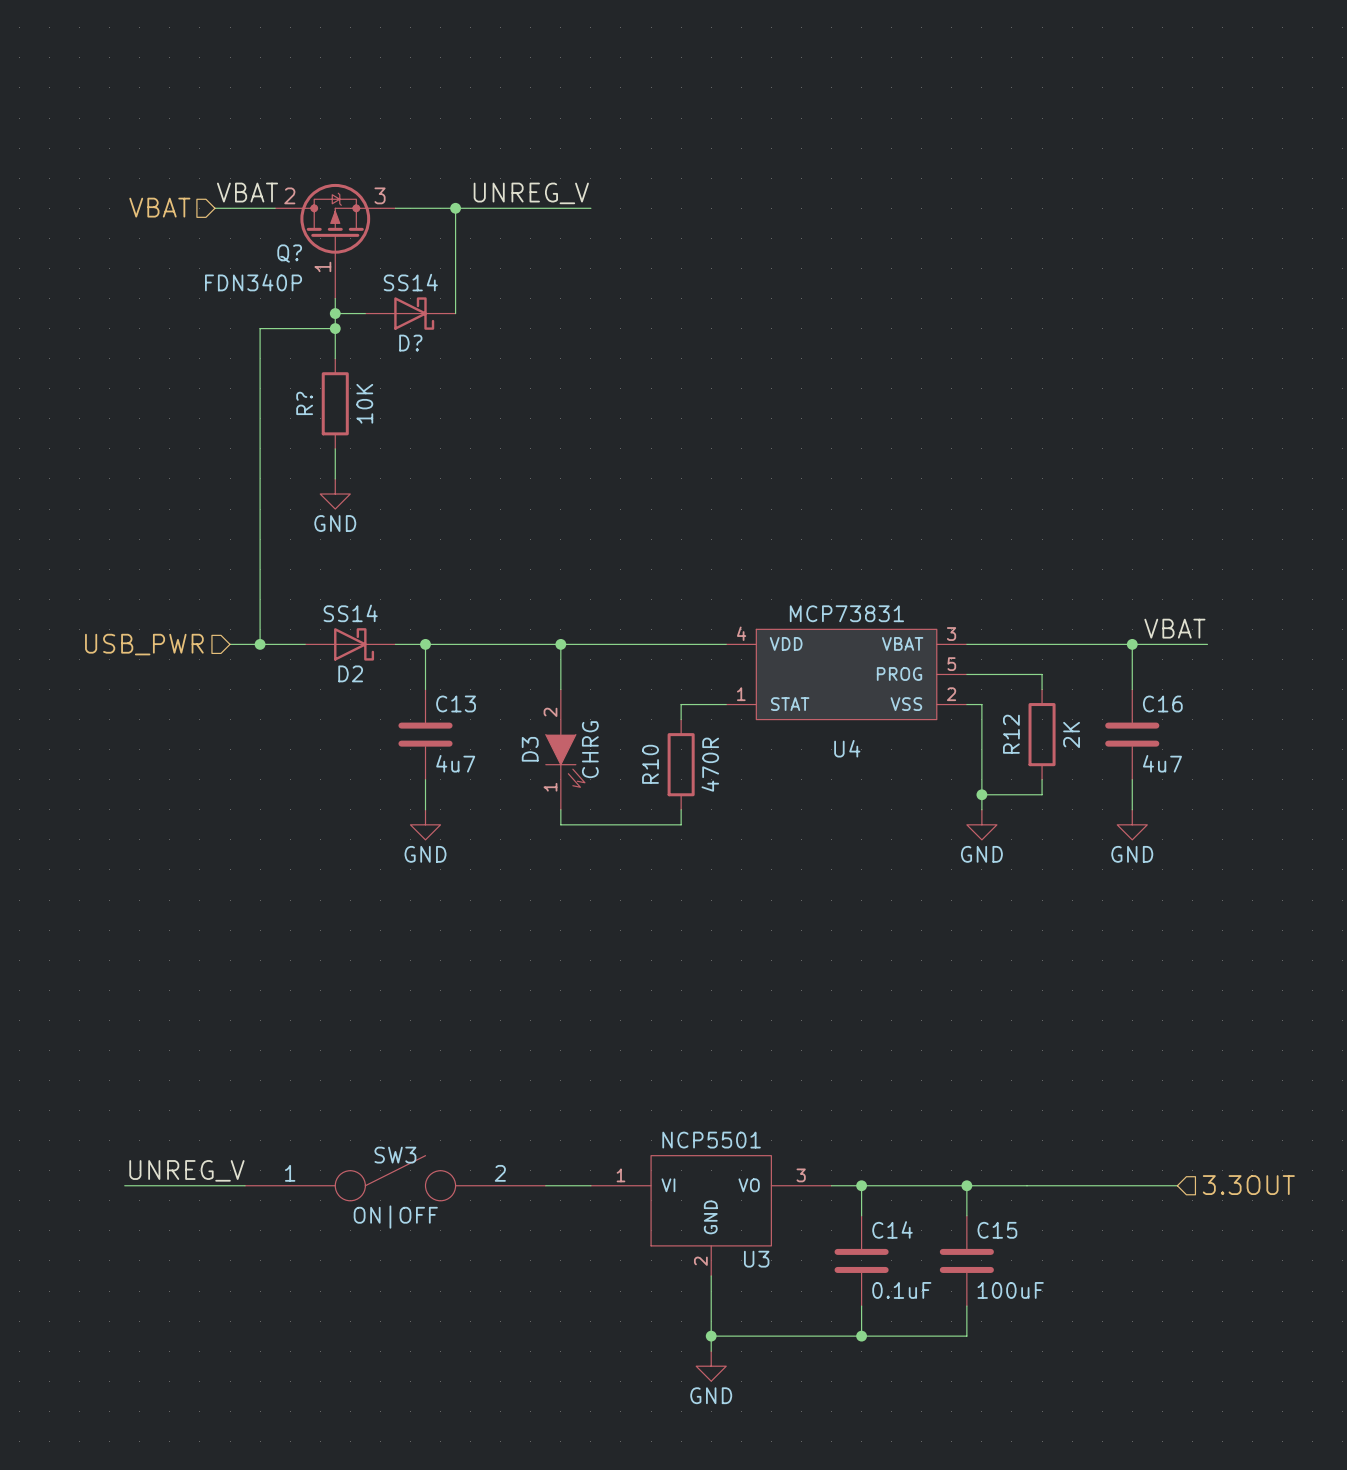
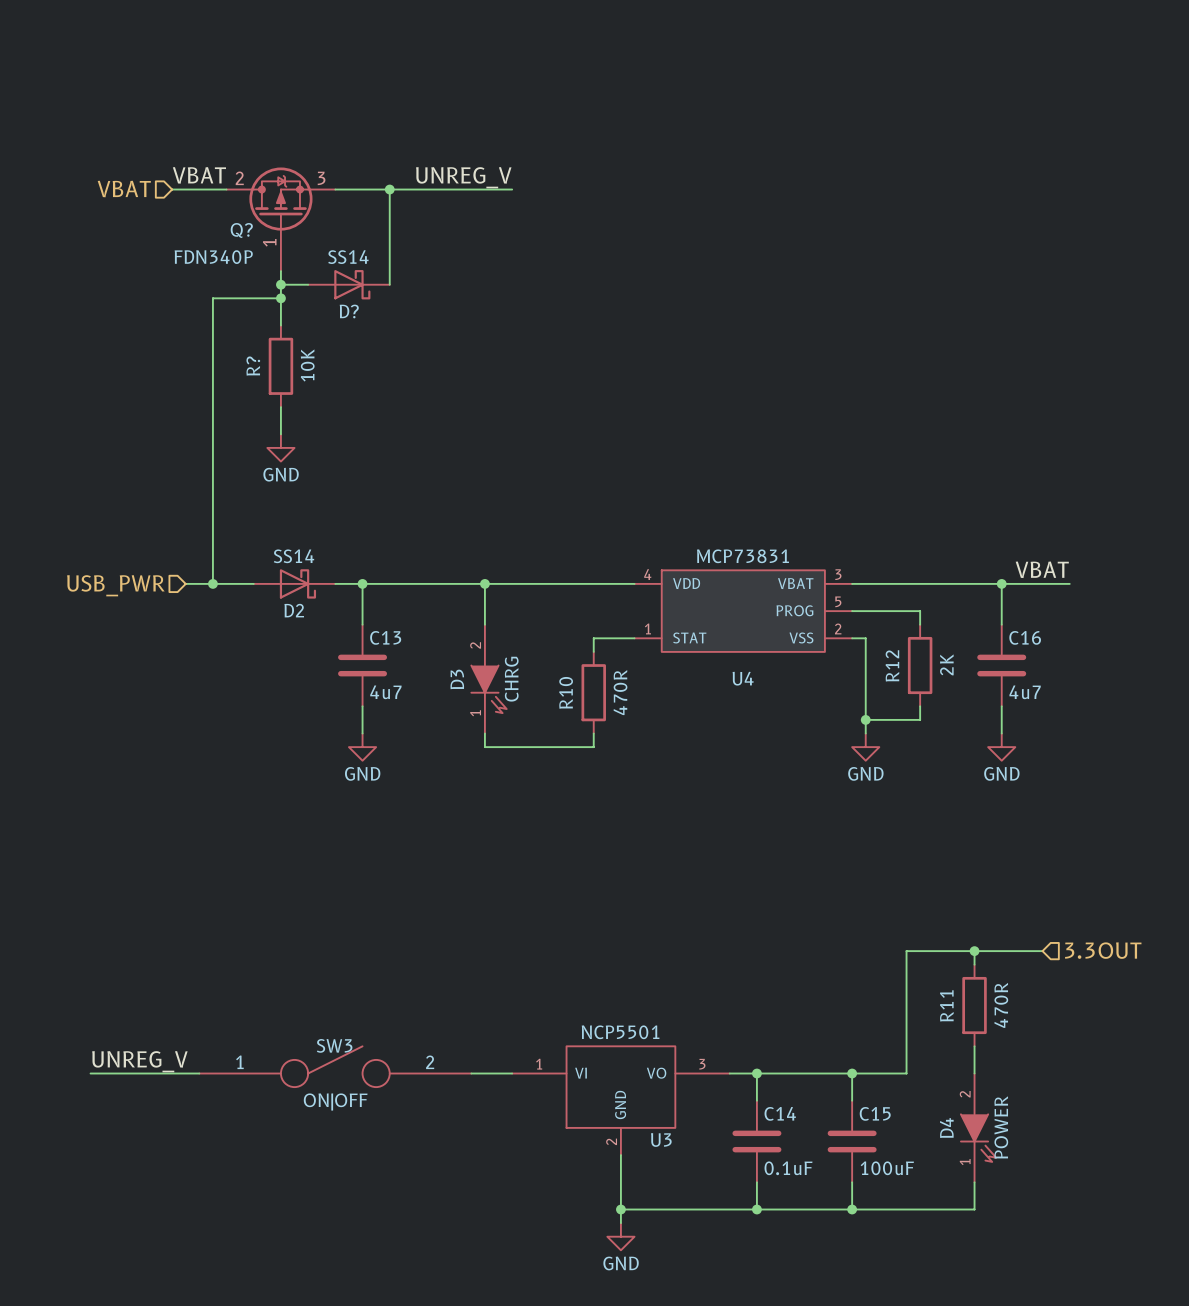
wire: none -> (974, 951) (974, 964)
junction: none -> (974, 951)
R11: none -> 470R (974, 1005)
wire: none -> (974, 1046) (974, 1073)
wire: (1027, 1185) (1177, 1185) -> (906, 1073) (906, 951) (1042, 951)
hierarchical label position: 3.3OUT (1248, 1185) -> 3.3OUT (1103, 950)
D4: none -> POWER (978, 1127)
wire: none -> (974, 1182) (974, 1209) (852, 1209)
junction: none -> (852, 1209)

